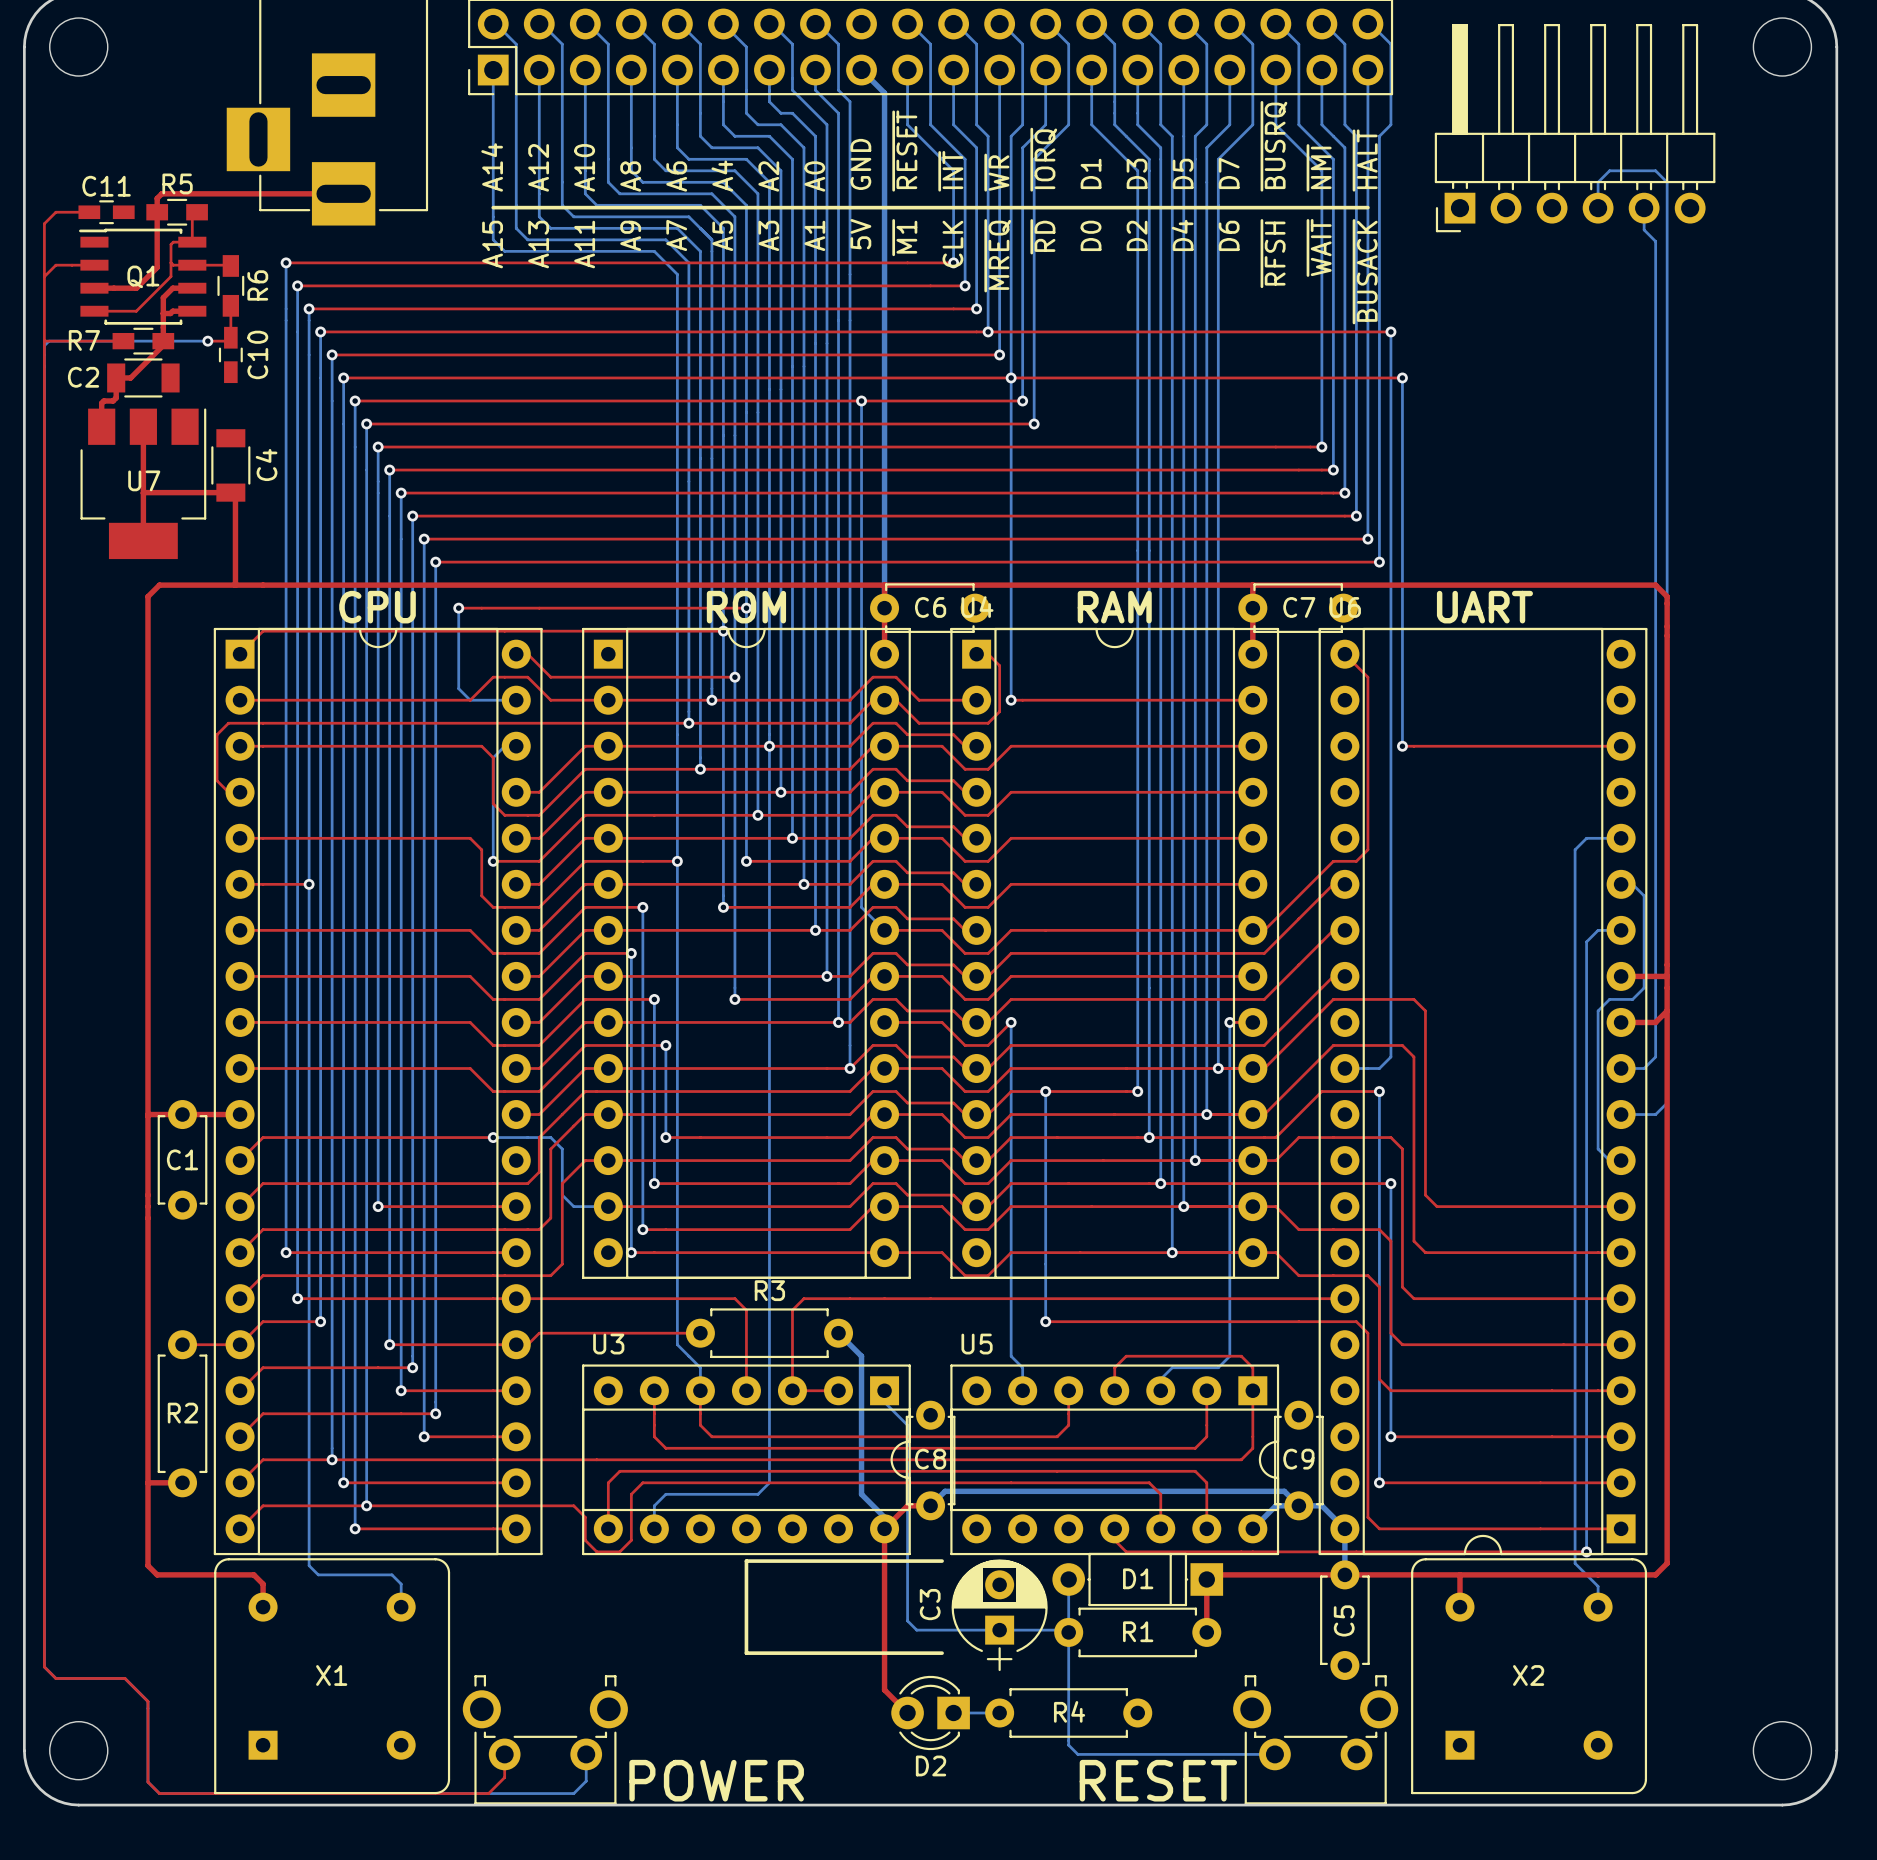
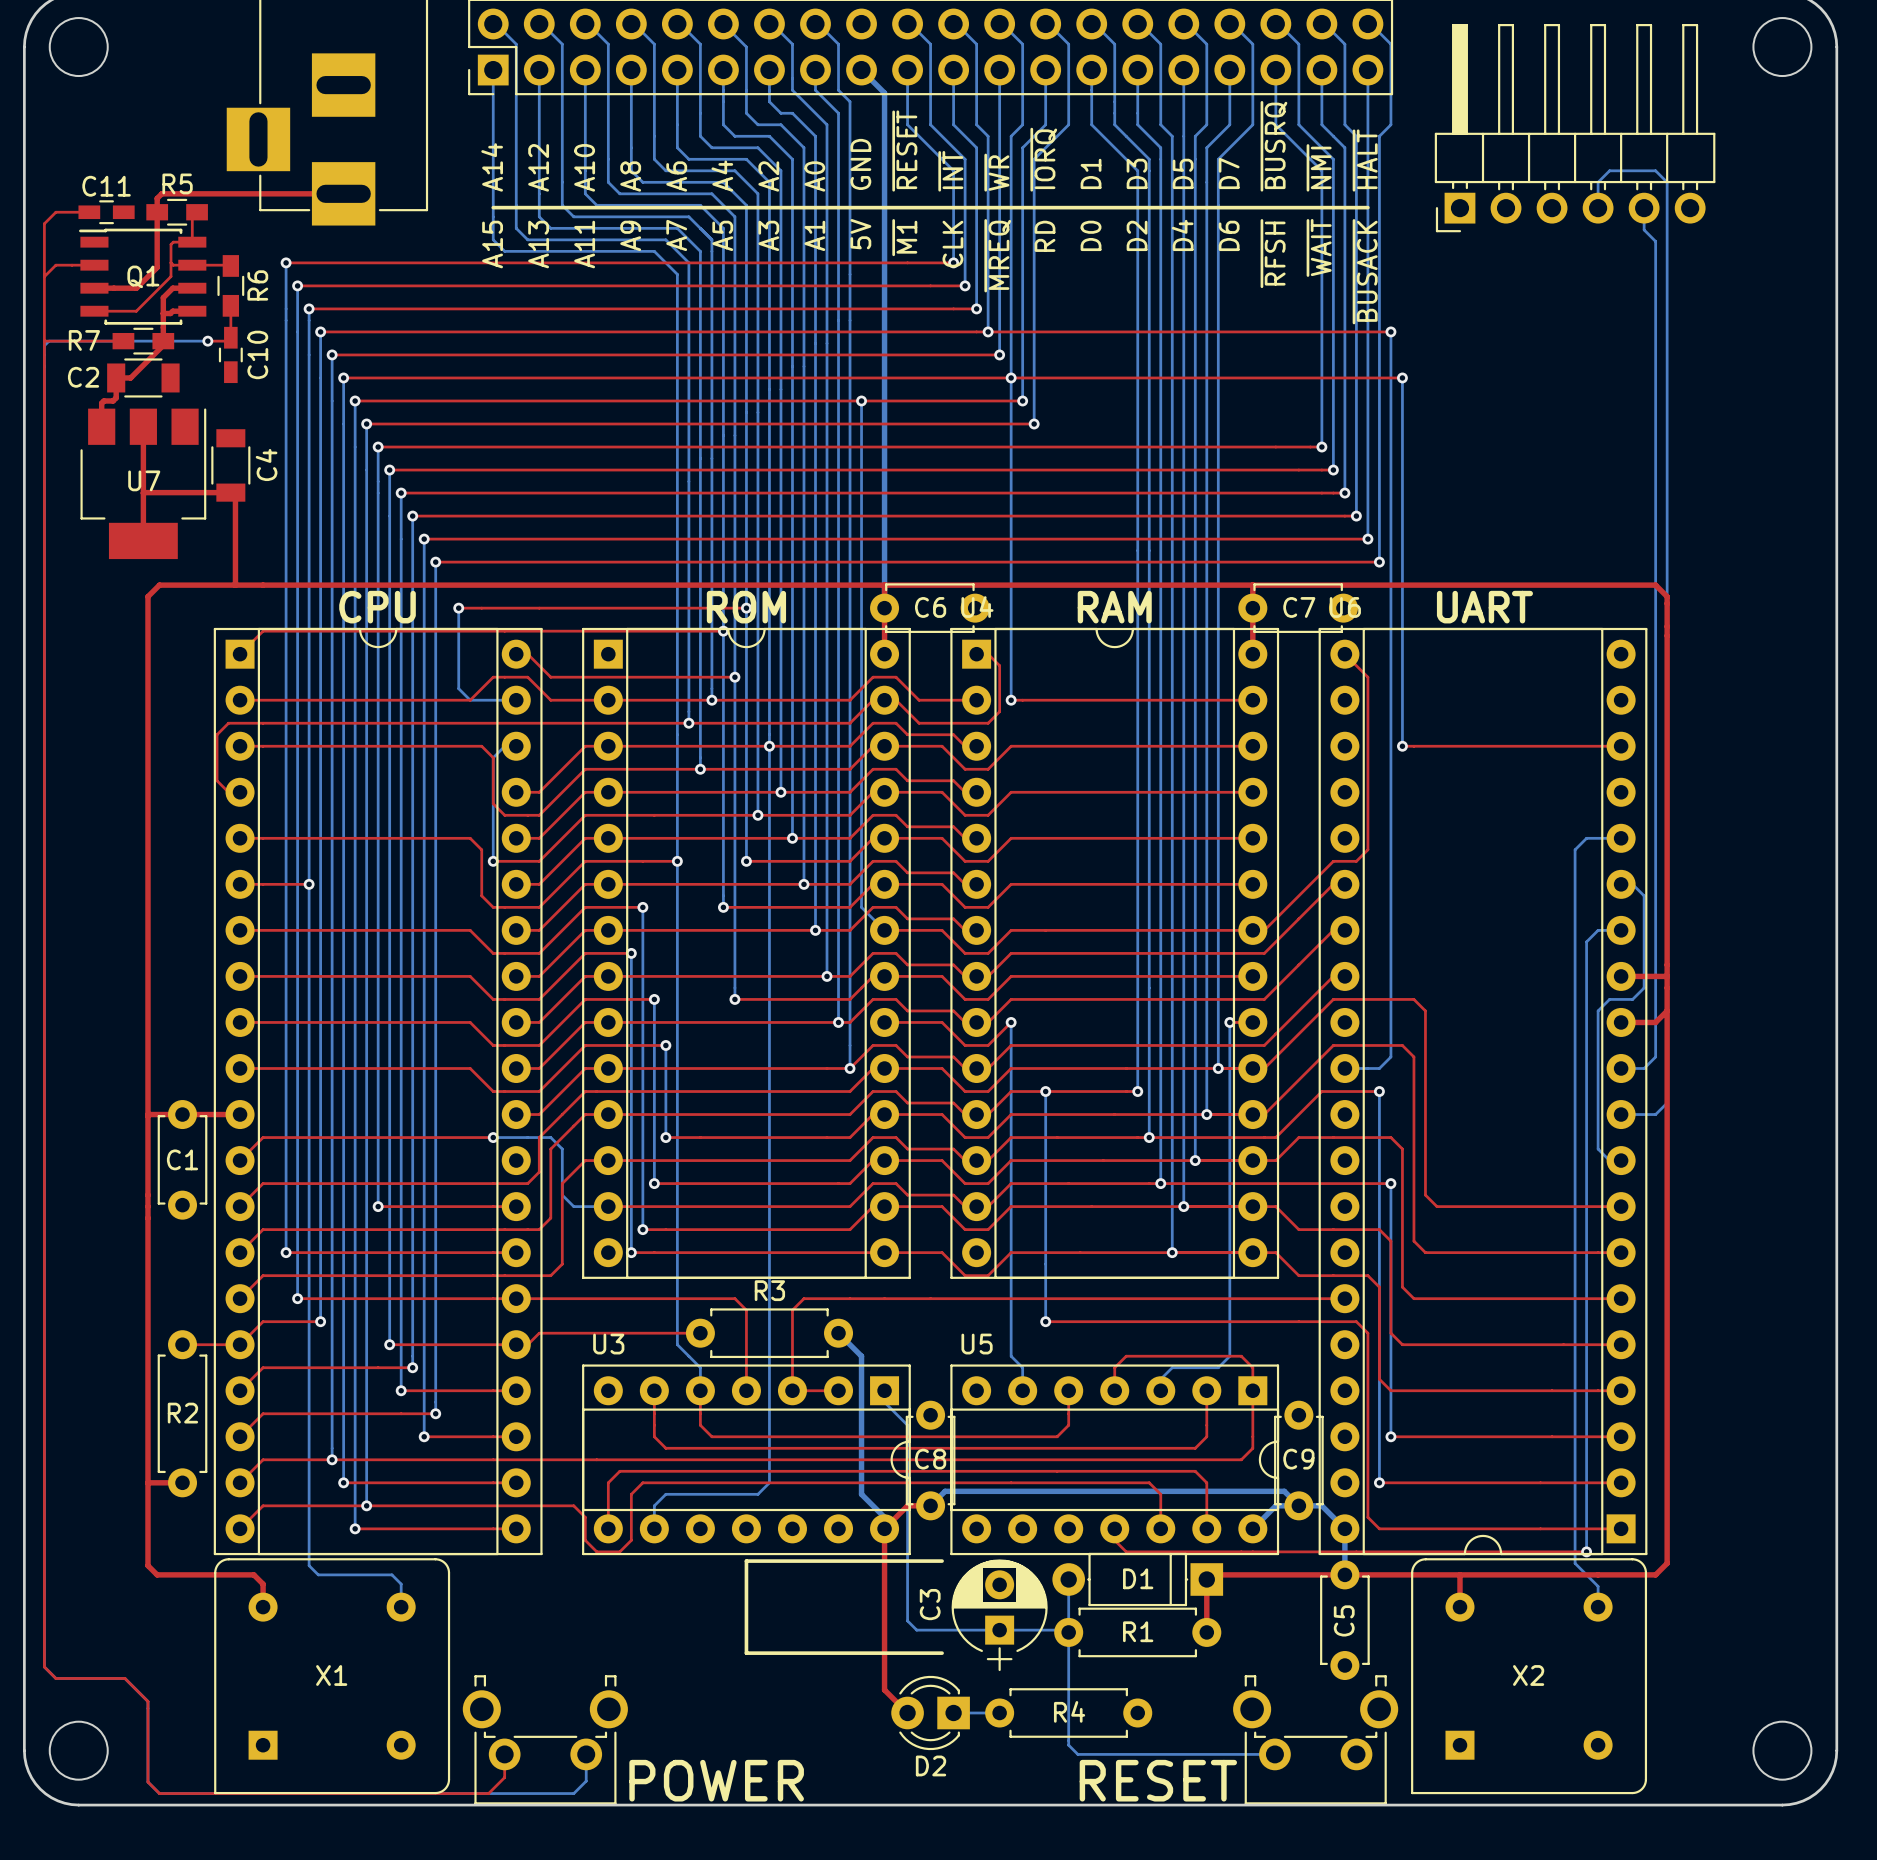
text: ~{RD} (1042, 236) -> RD (1044, 236)

